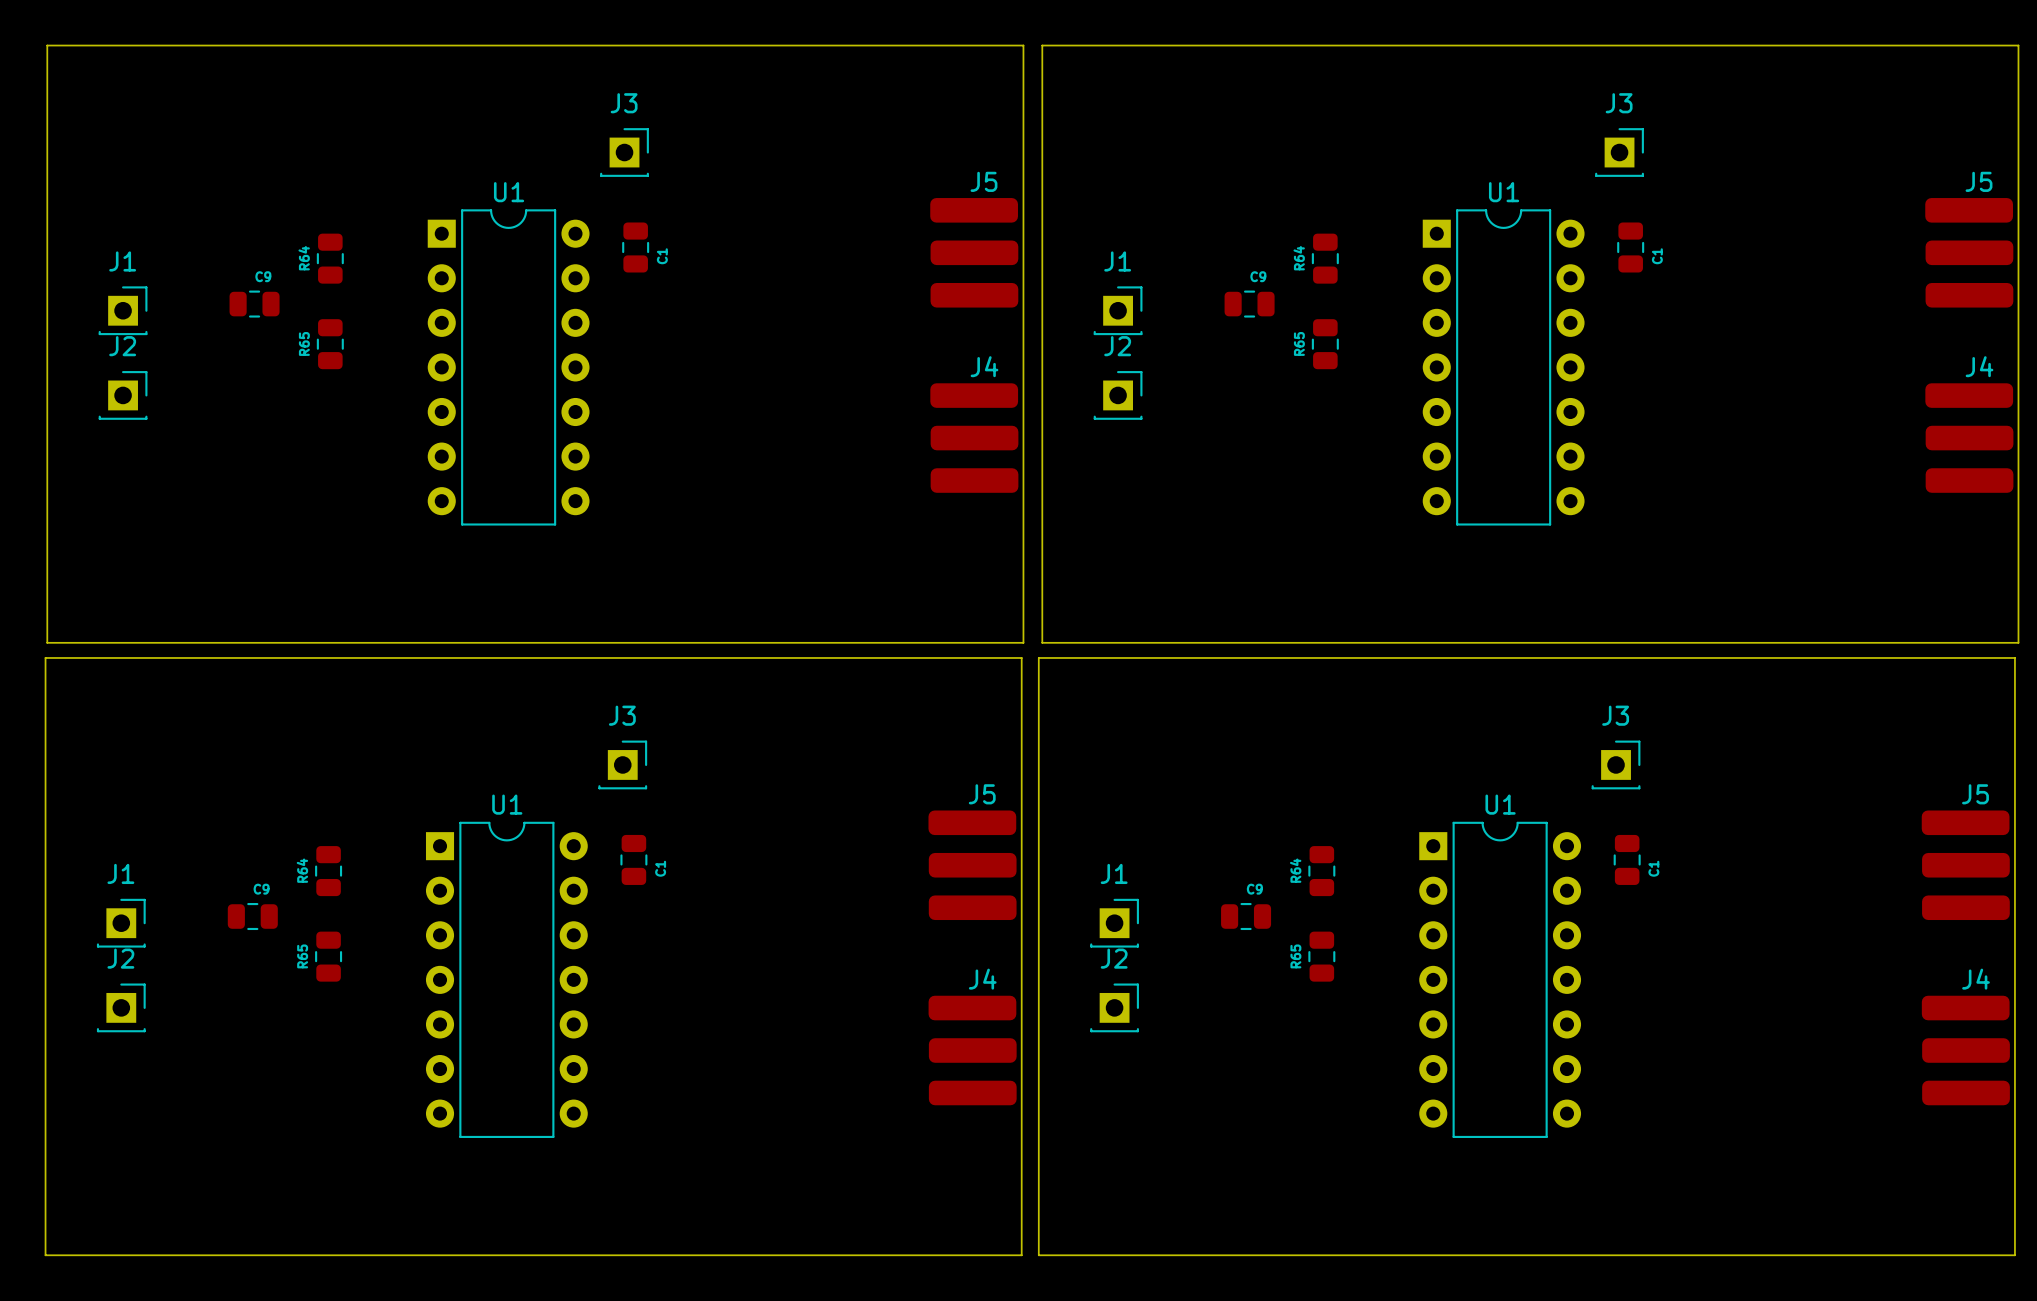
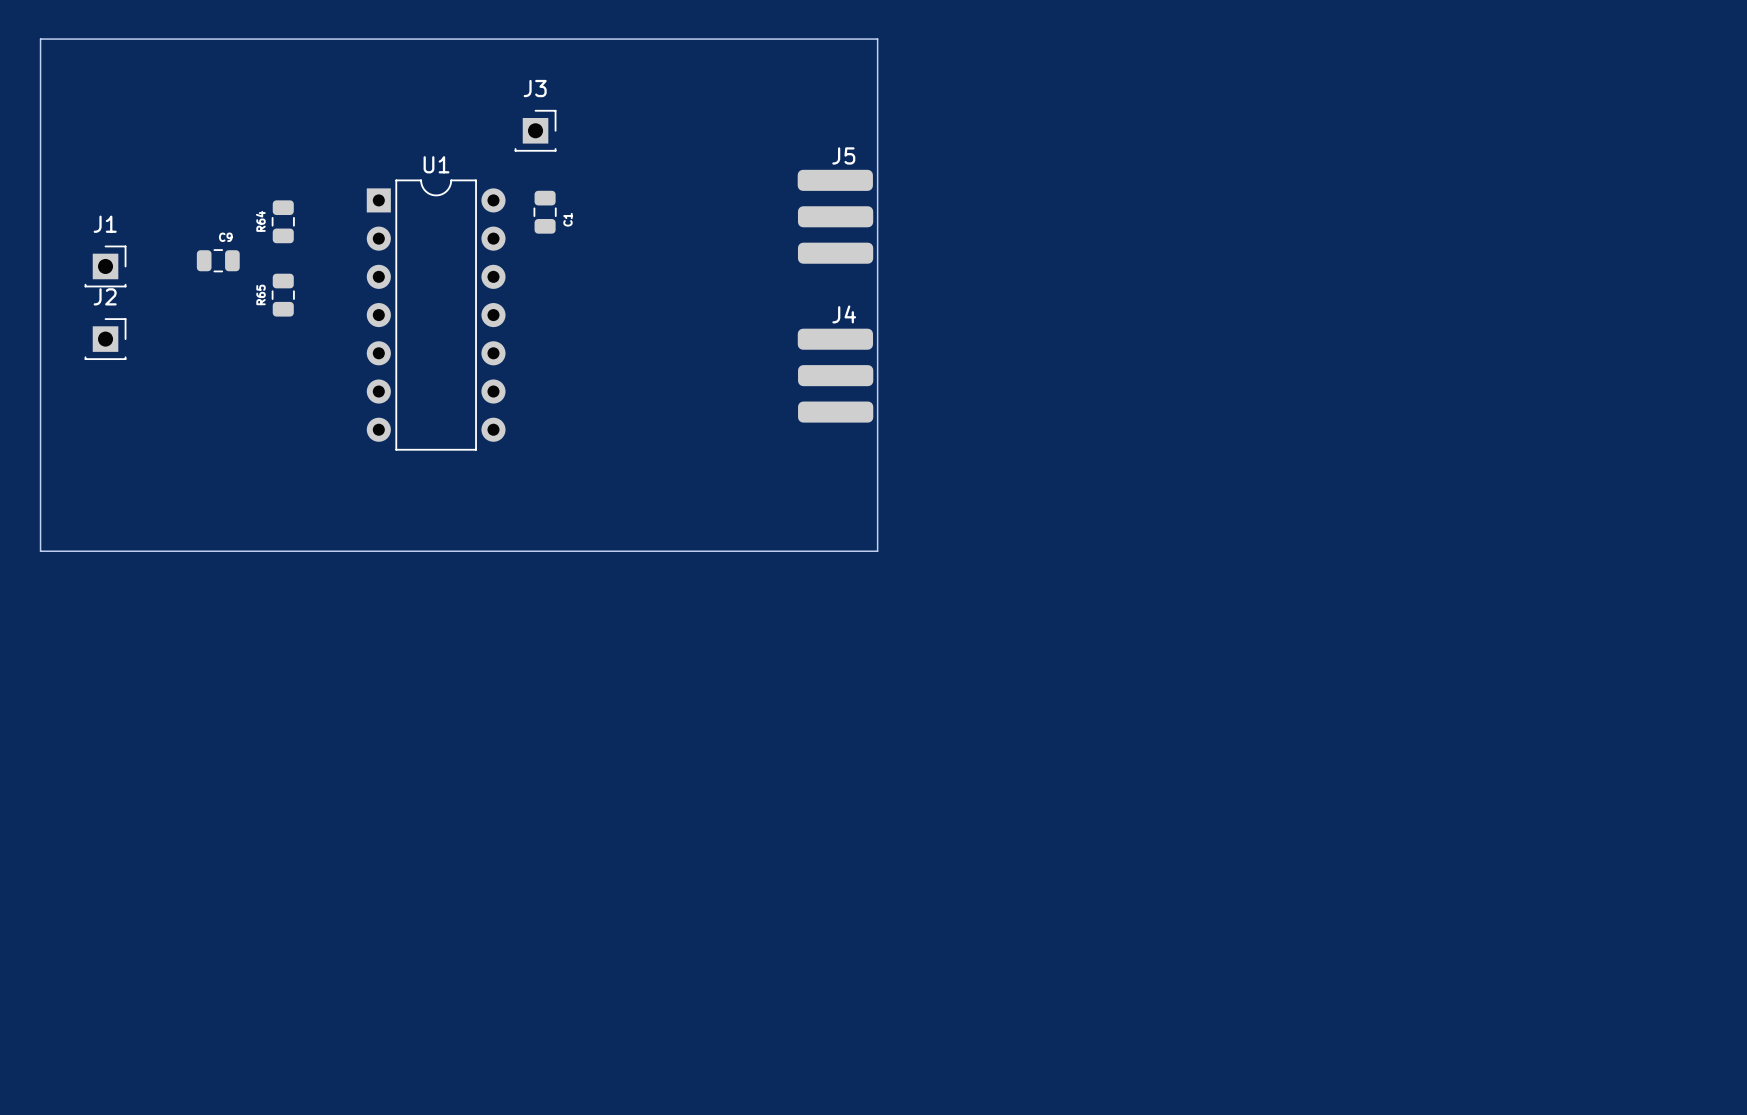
board edge: (1042, 45) (2018, 45) (2018, 642) (1042, 642) (1042, 45) -> none
J3: (1619, 152) -> none
C1: (1630, 247) -> none
J5: (1969, 252) -> none
R64: (1325, 258) -> none
C9: (1249, 304) -> none
J1: (1118, 310) -> none
R65: (1325, 344) -> none
U1: (1503, 367) -> none
J2: (1118, 395) -> none
J4: (1969, 438) -> none
board edge: (45, 657) (1021, 657) (1021, 1255) (45, 1255) (45, 657) -> none
board edge: (1038, 657) (2014, 657) (2014, 1255) (1038, 1255) (1038, 657) -> none
J3: (622, 764) -> none
J3: (1616, 764) -> none
C1: (633, 859) -> none
C1: (1627, 859) -> none
J5: (972, 865) -> none
J5: (1965, 865) -> none
R64: (328, 871) -> none
R64: (1321, 871) -> none
C9: (252, 916) -> none
C9: (1246, 916) -> none
J1: (121, 923) -> none
J1: (1114, 923) -> none
R65: (328, 956) -> none
R65: (1321, 956) -> none
U1: (506, 979) -> none
U1: (1500, 979) -> none
J2: (121, 1007) -> none
J2: (1114, 1007) -> none
J4: (972, 1050) -> none
J4: (1965, 1050) -> none

